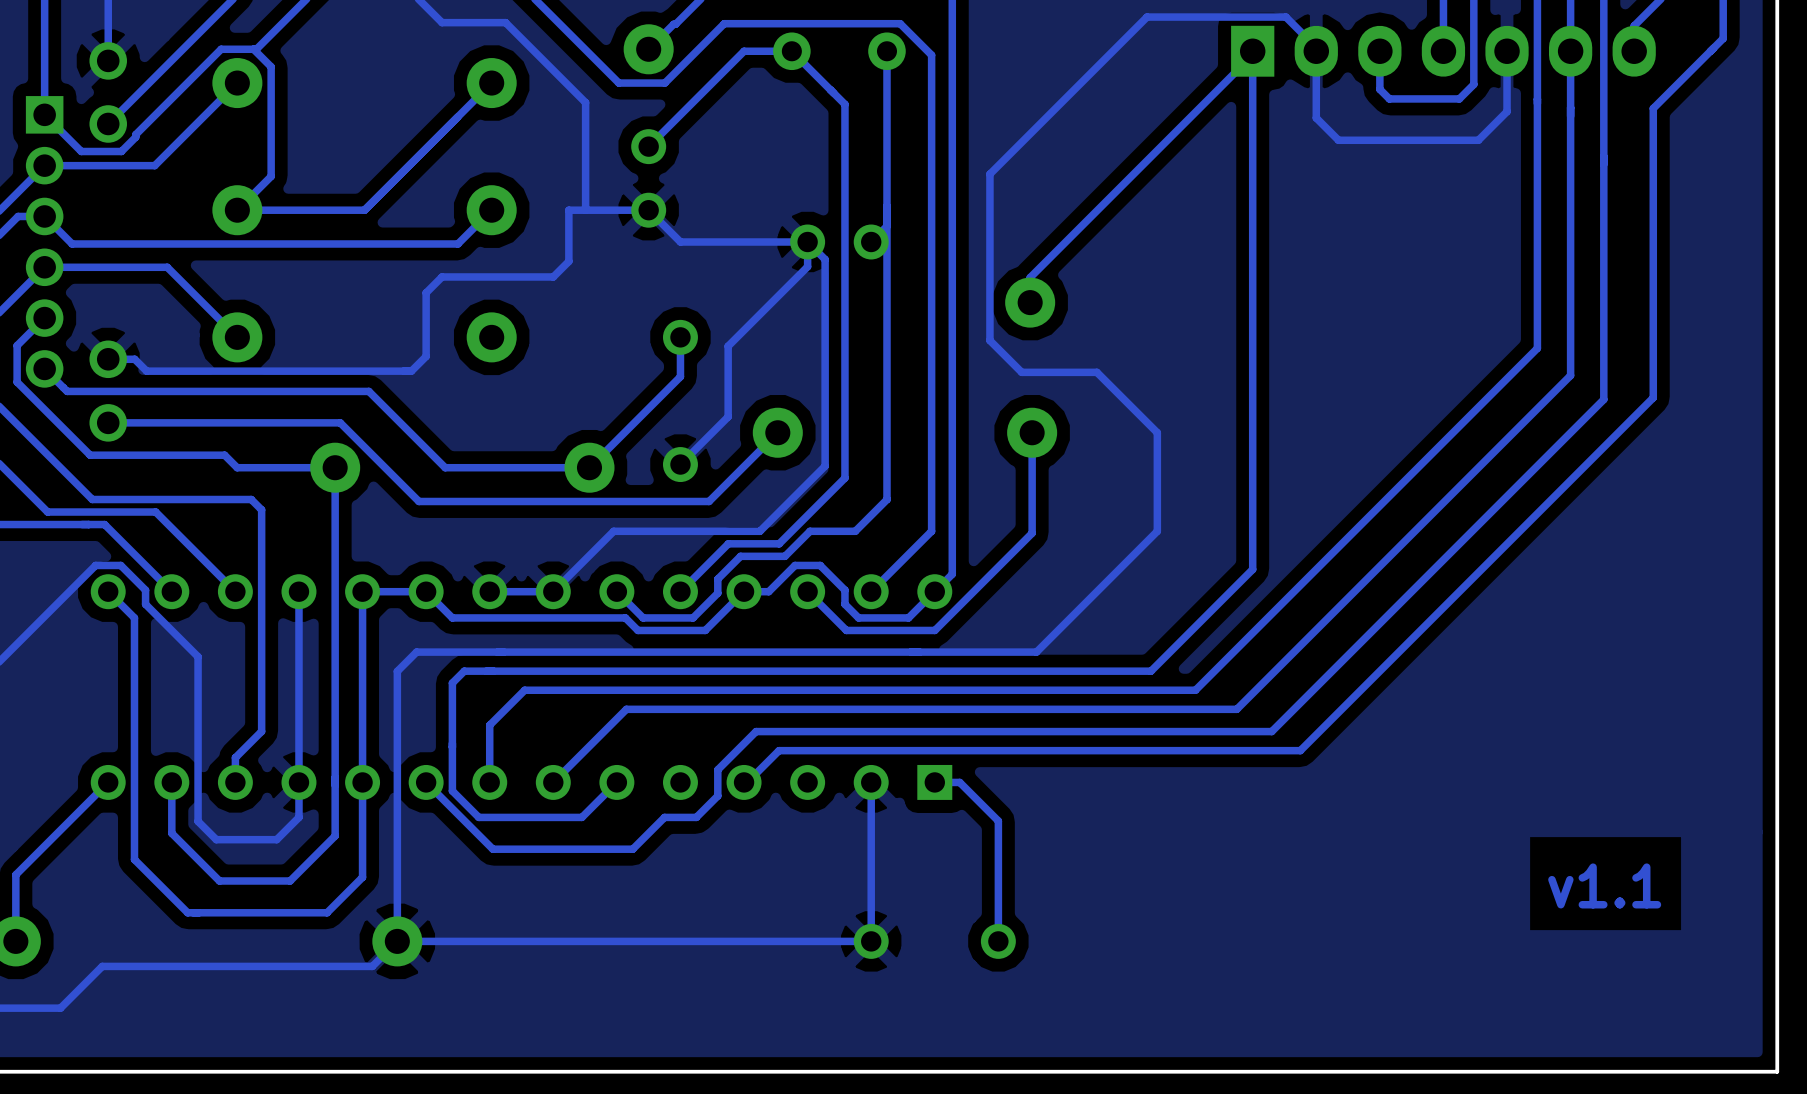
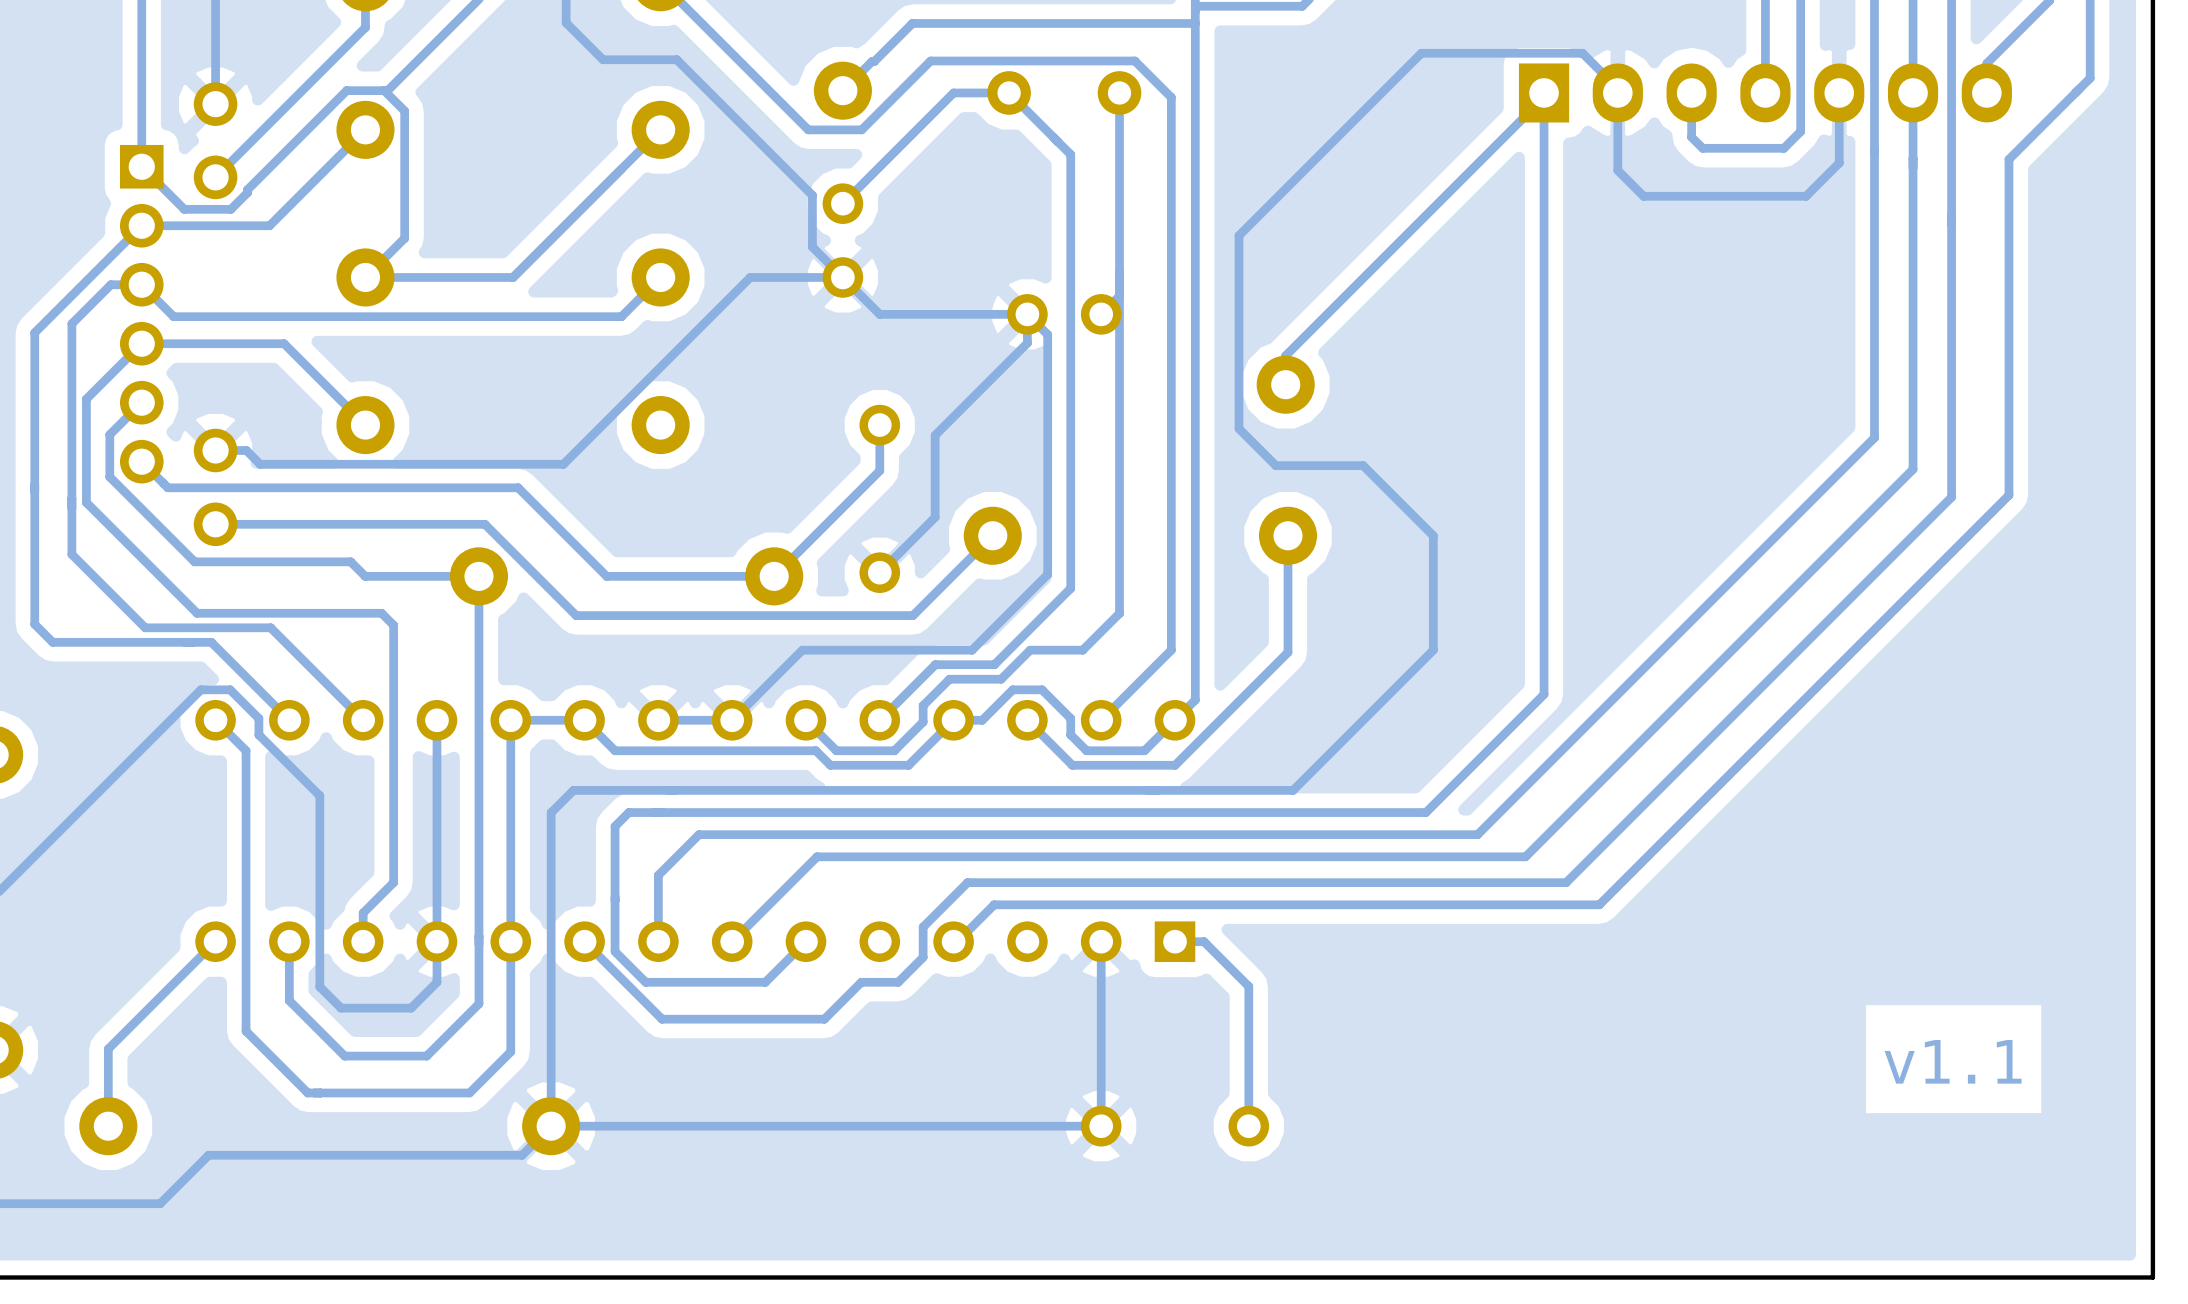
track: (585, 102) (585, 210) -> (769, 152) (812, 195) (812, 247) (842, 277)
track: (568, 210) (568, 261) (553, 276) (442, 276) (426, 292) (426, 356) (411, 371) (407, 371) -> (750, 277) (563, 464)

